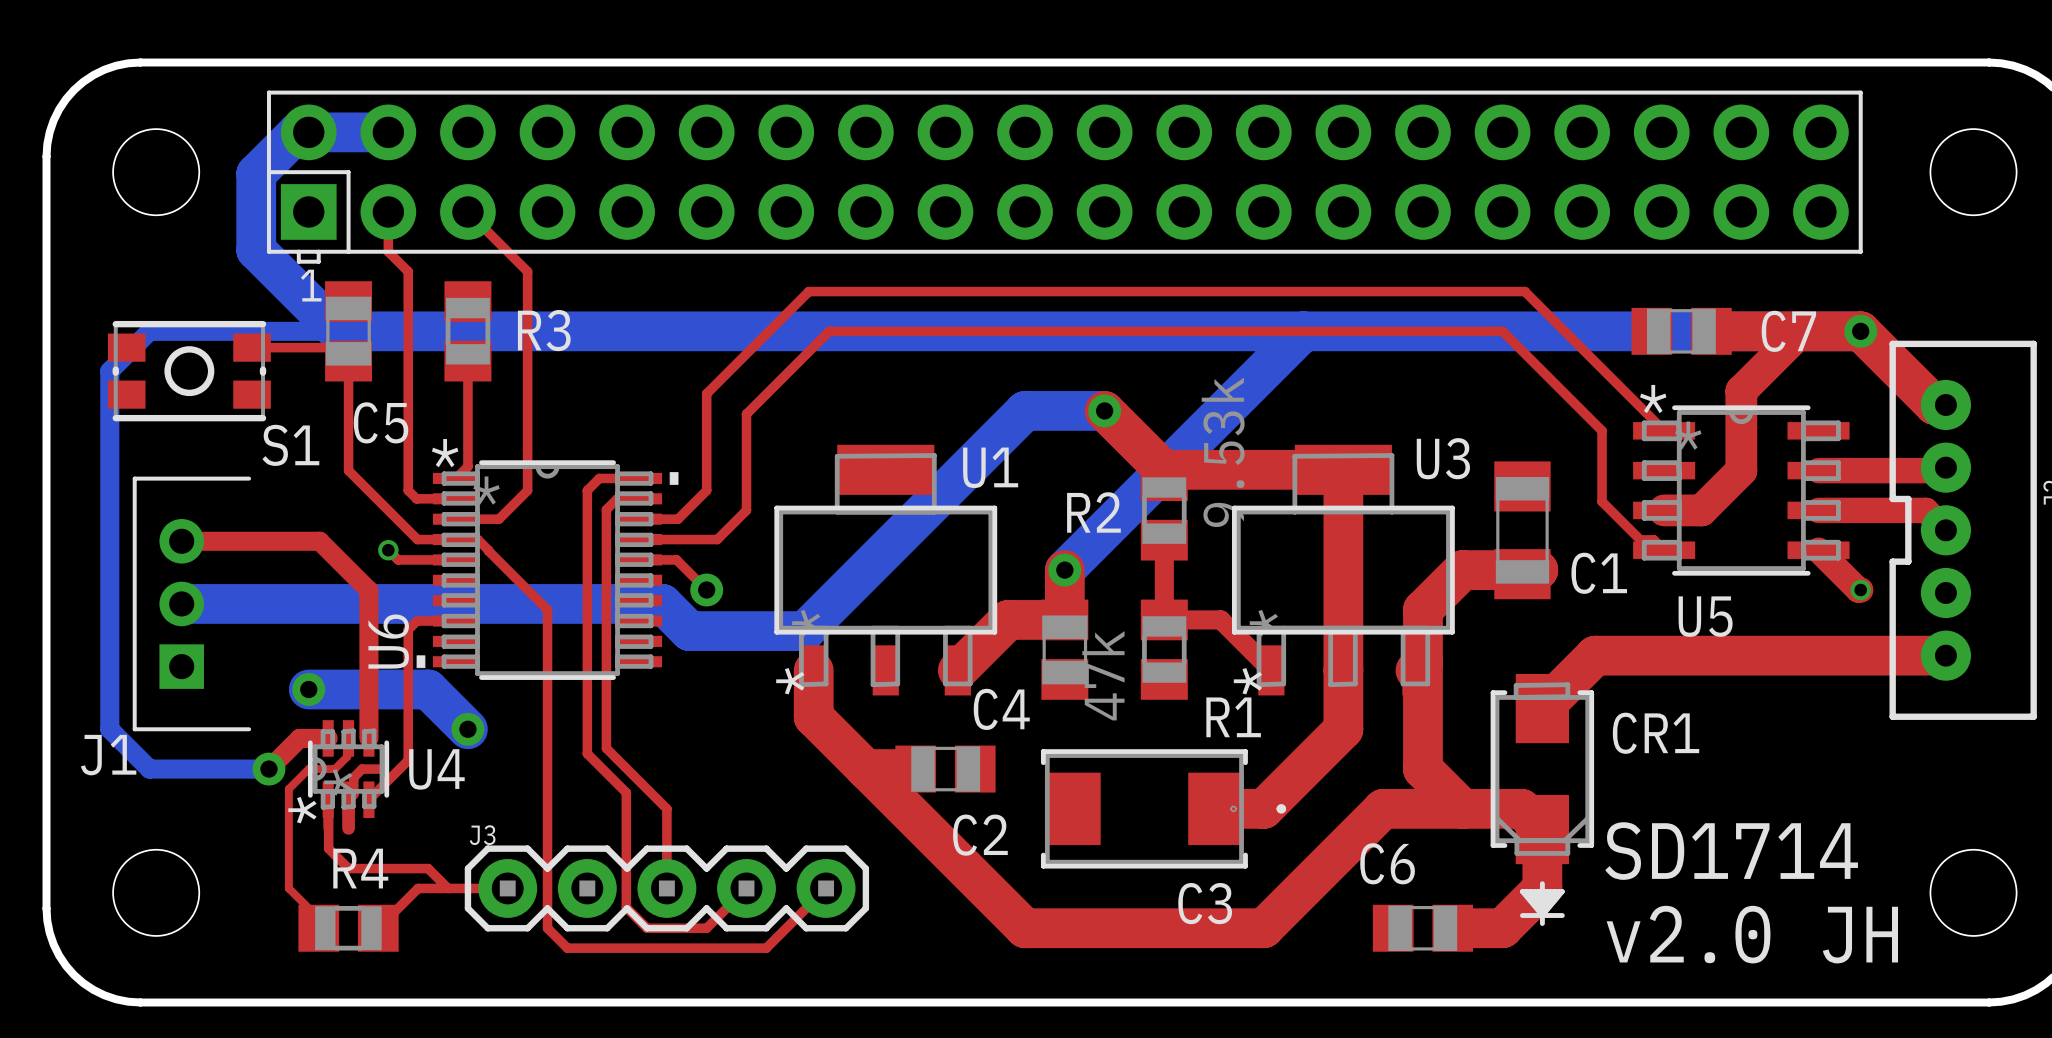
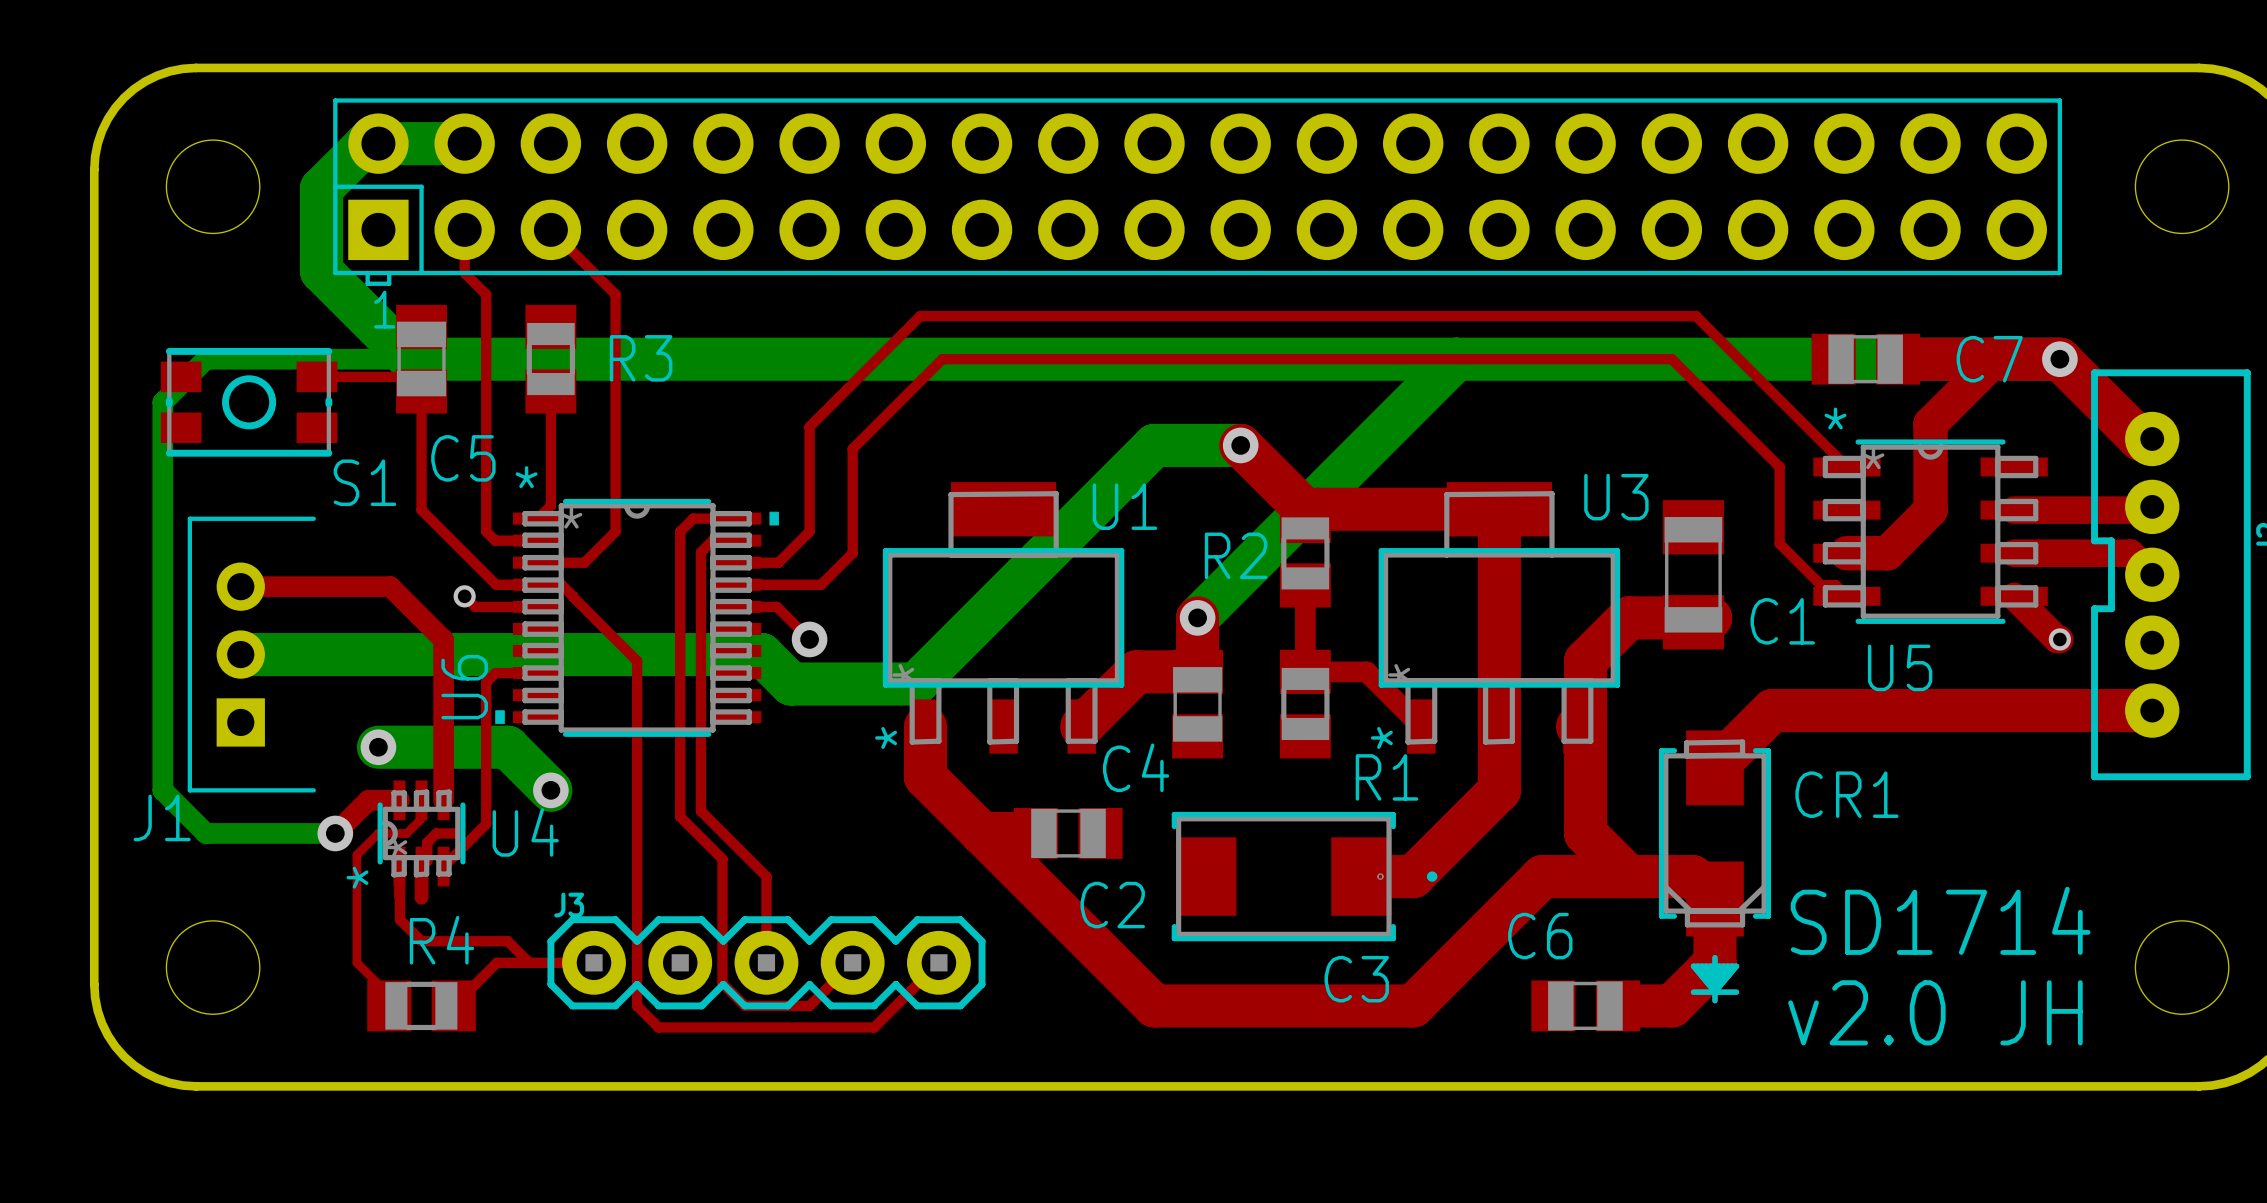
R2 value: 9.53k (1223, 452) -> none
R1 value: 47k (1103, 675) -> none

